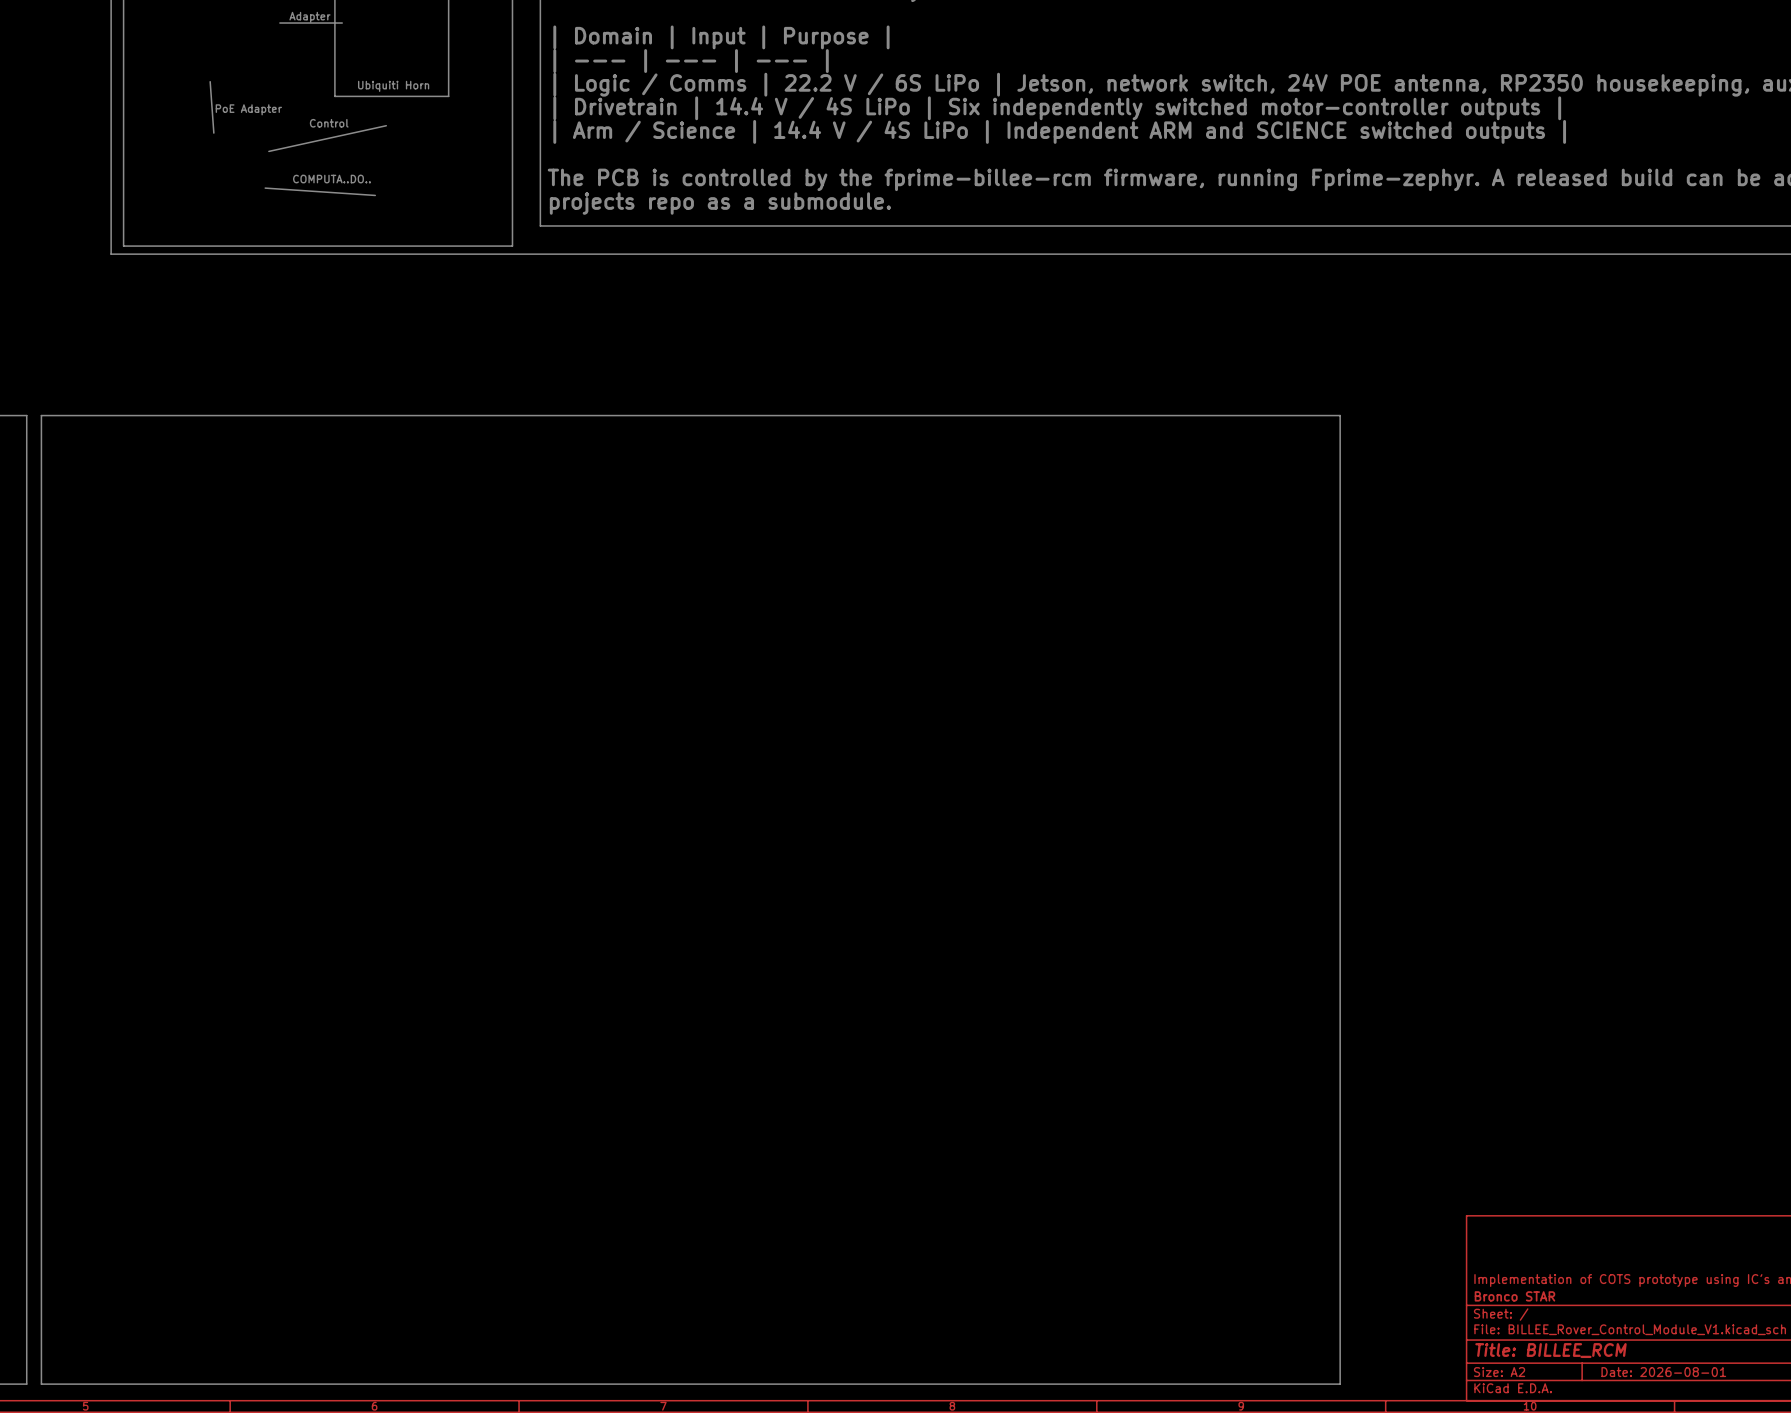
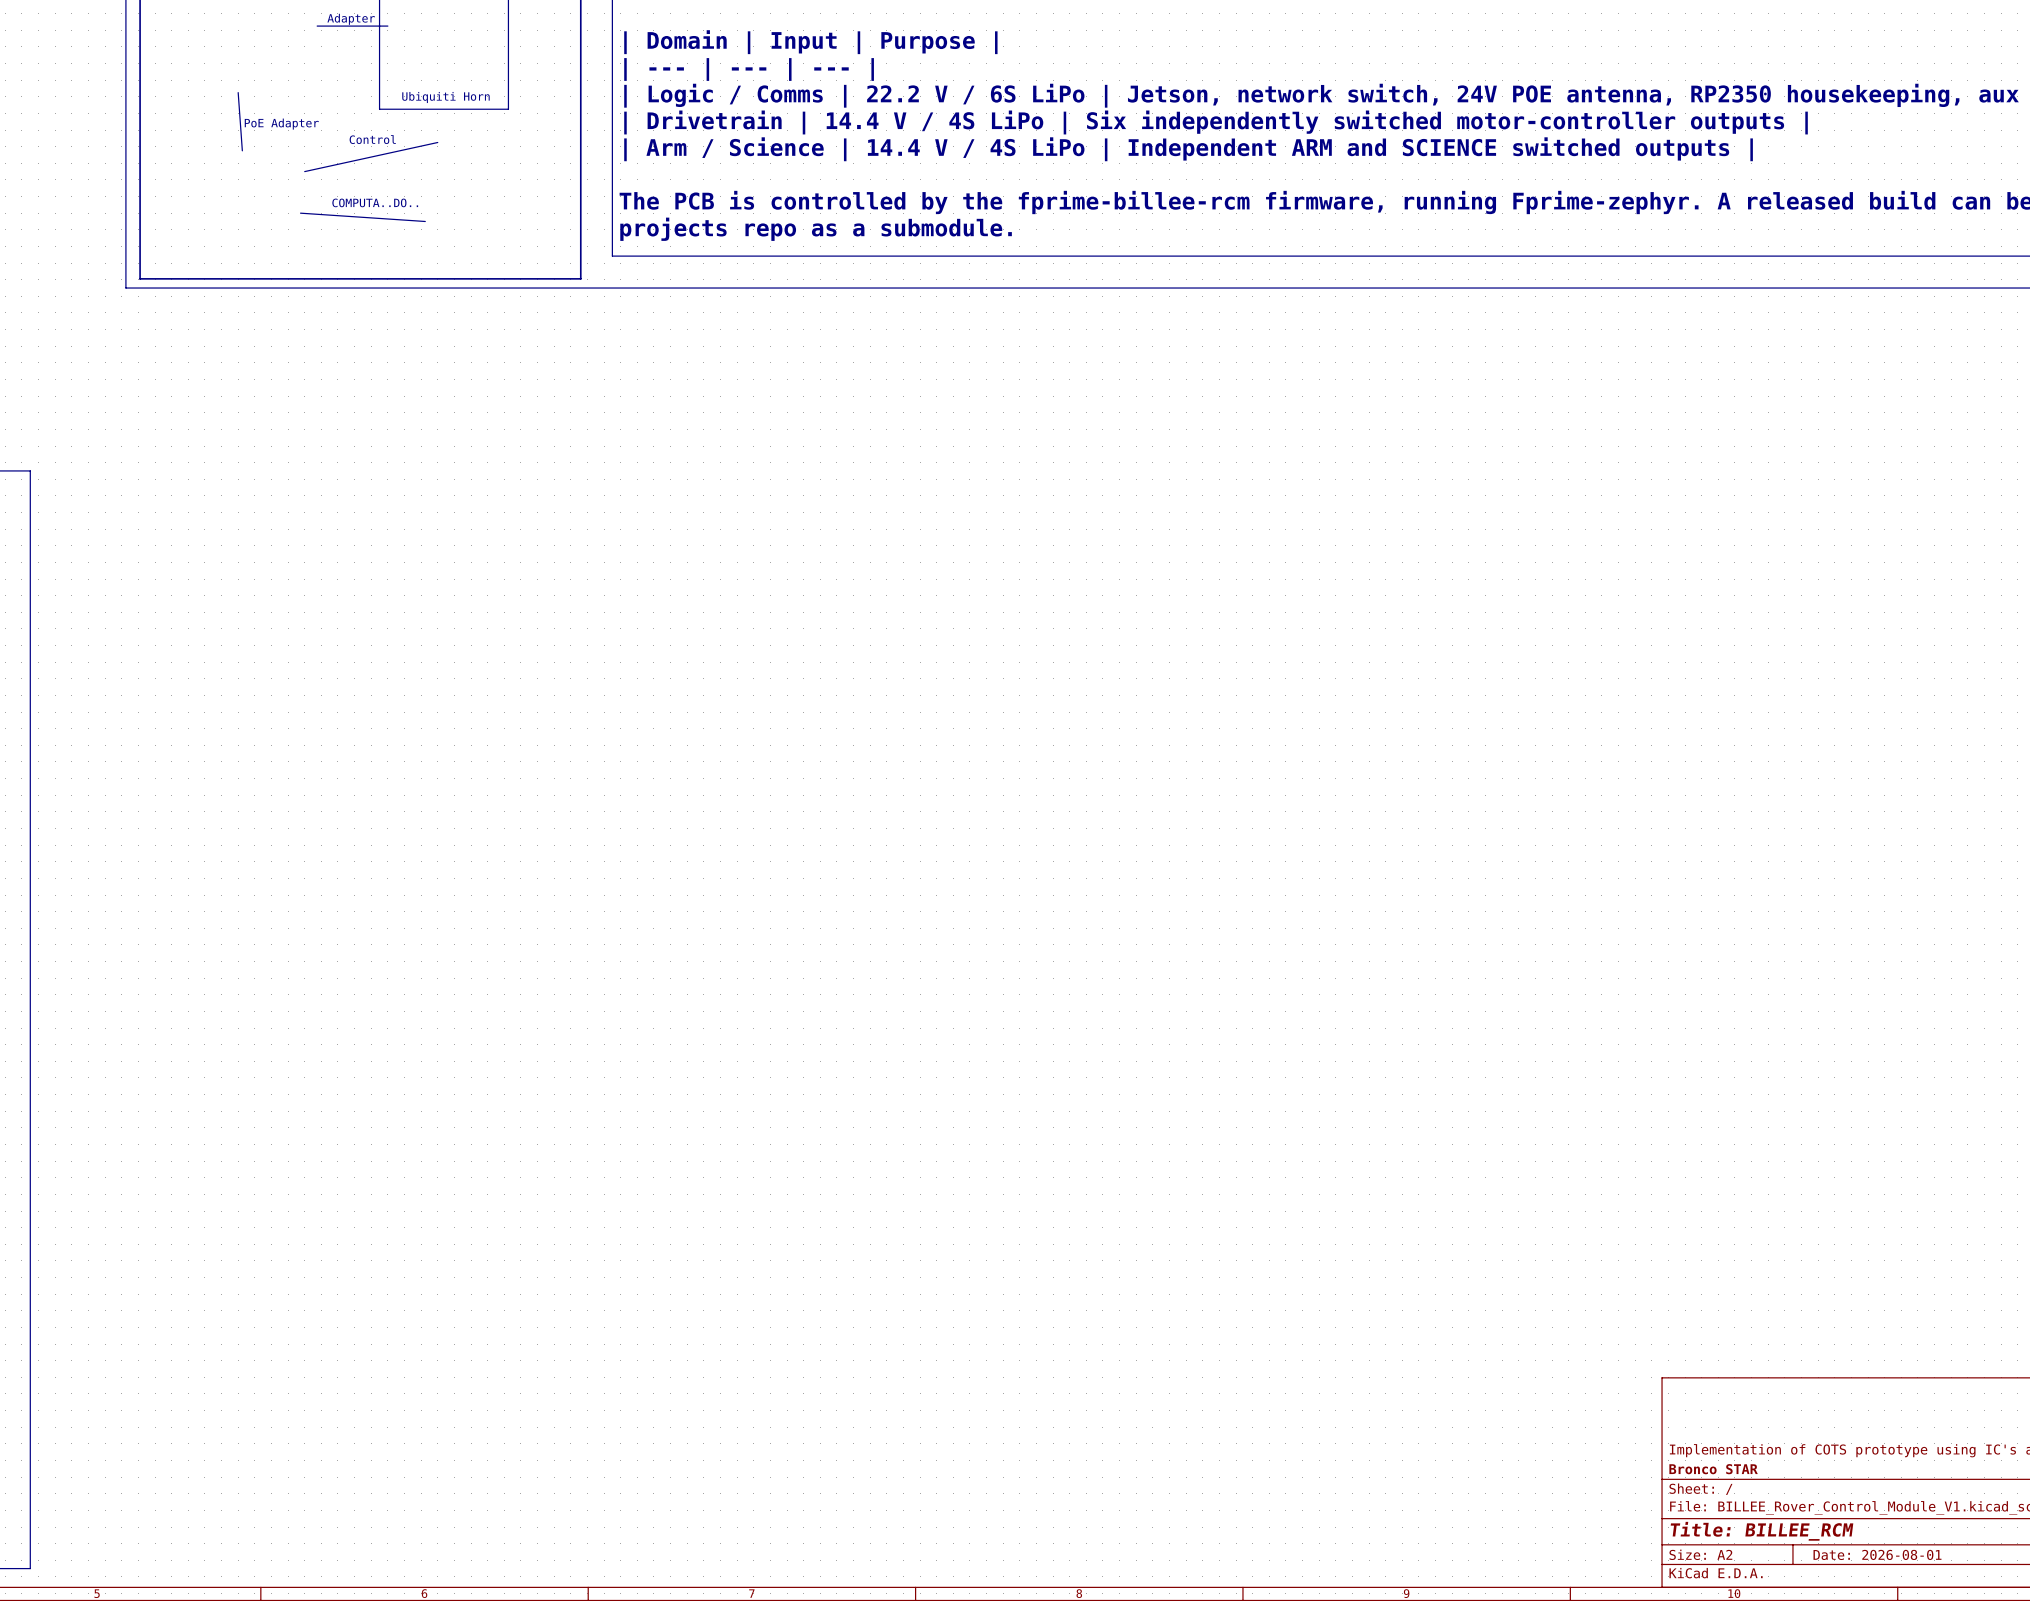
line: (41, 415) (1340, 415) (1340, 1384) (41, 1384) (41, 415) -> none

